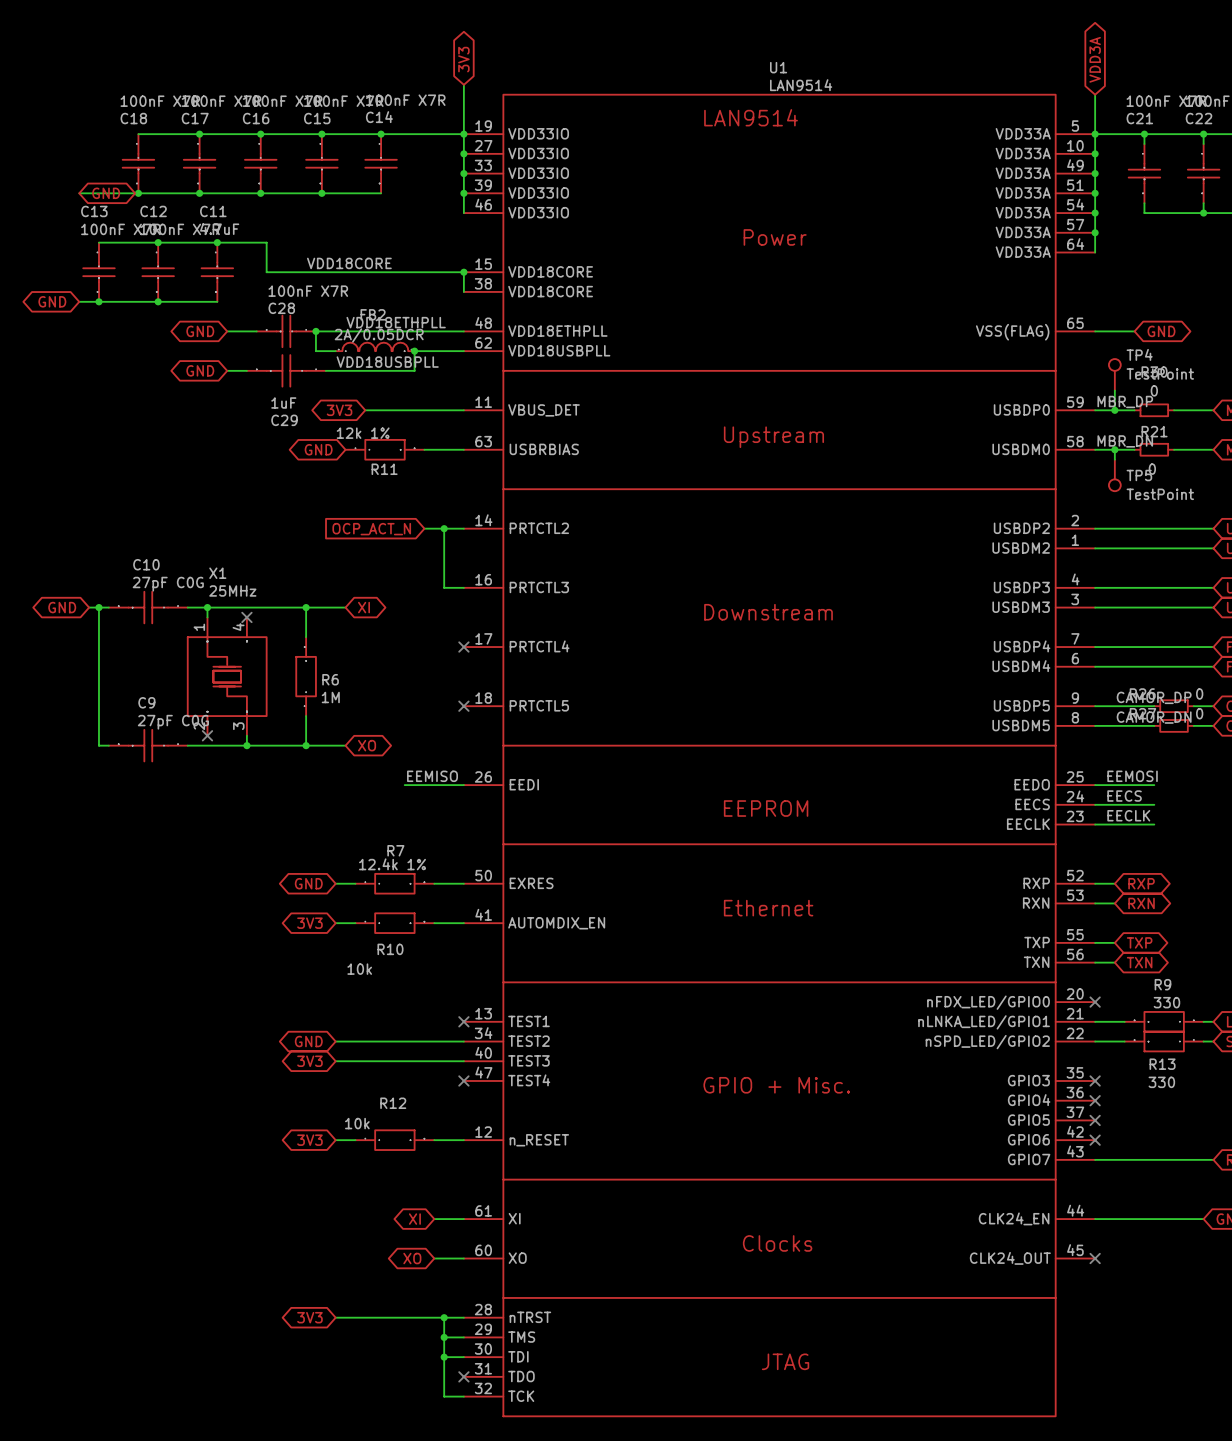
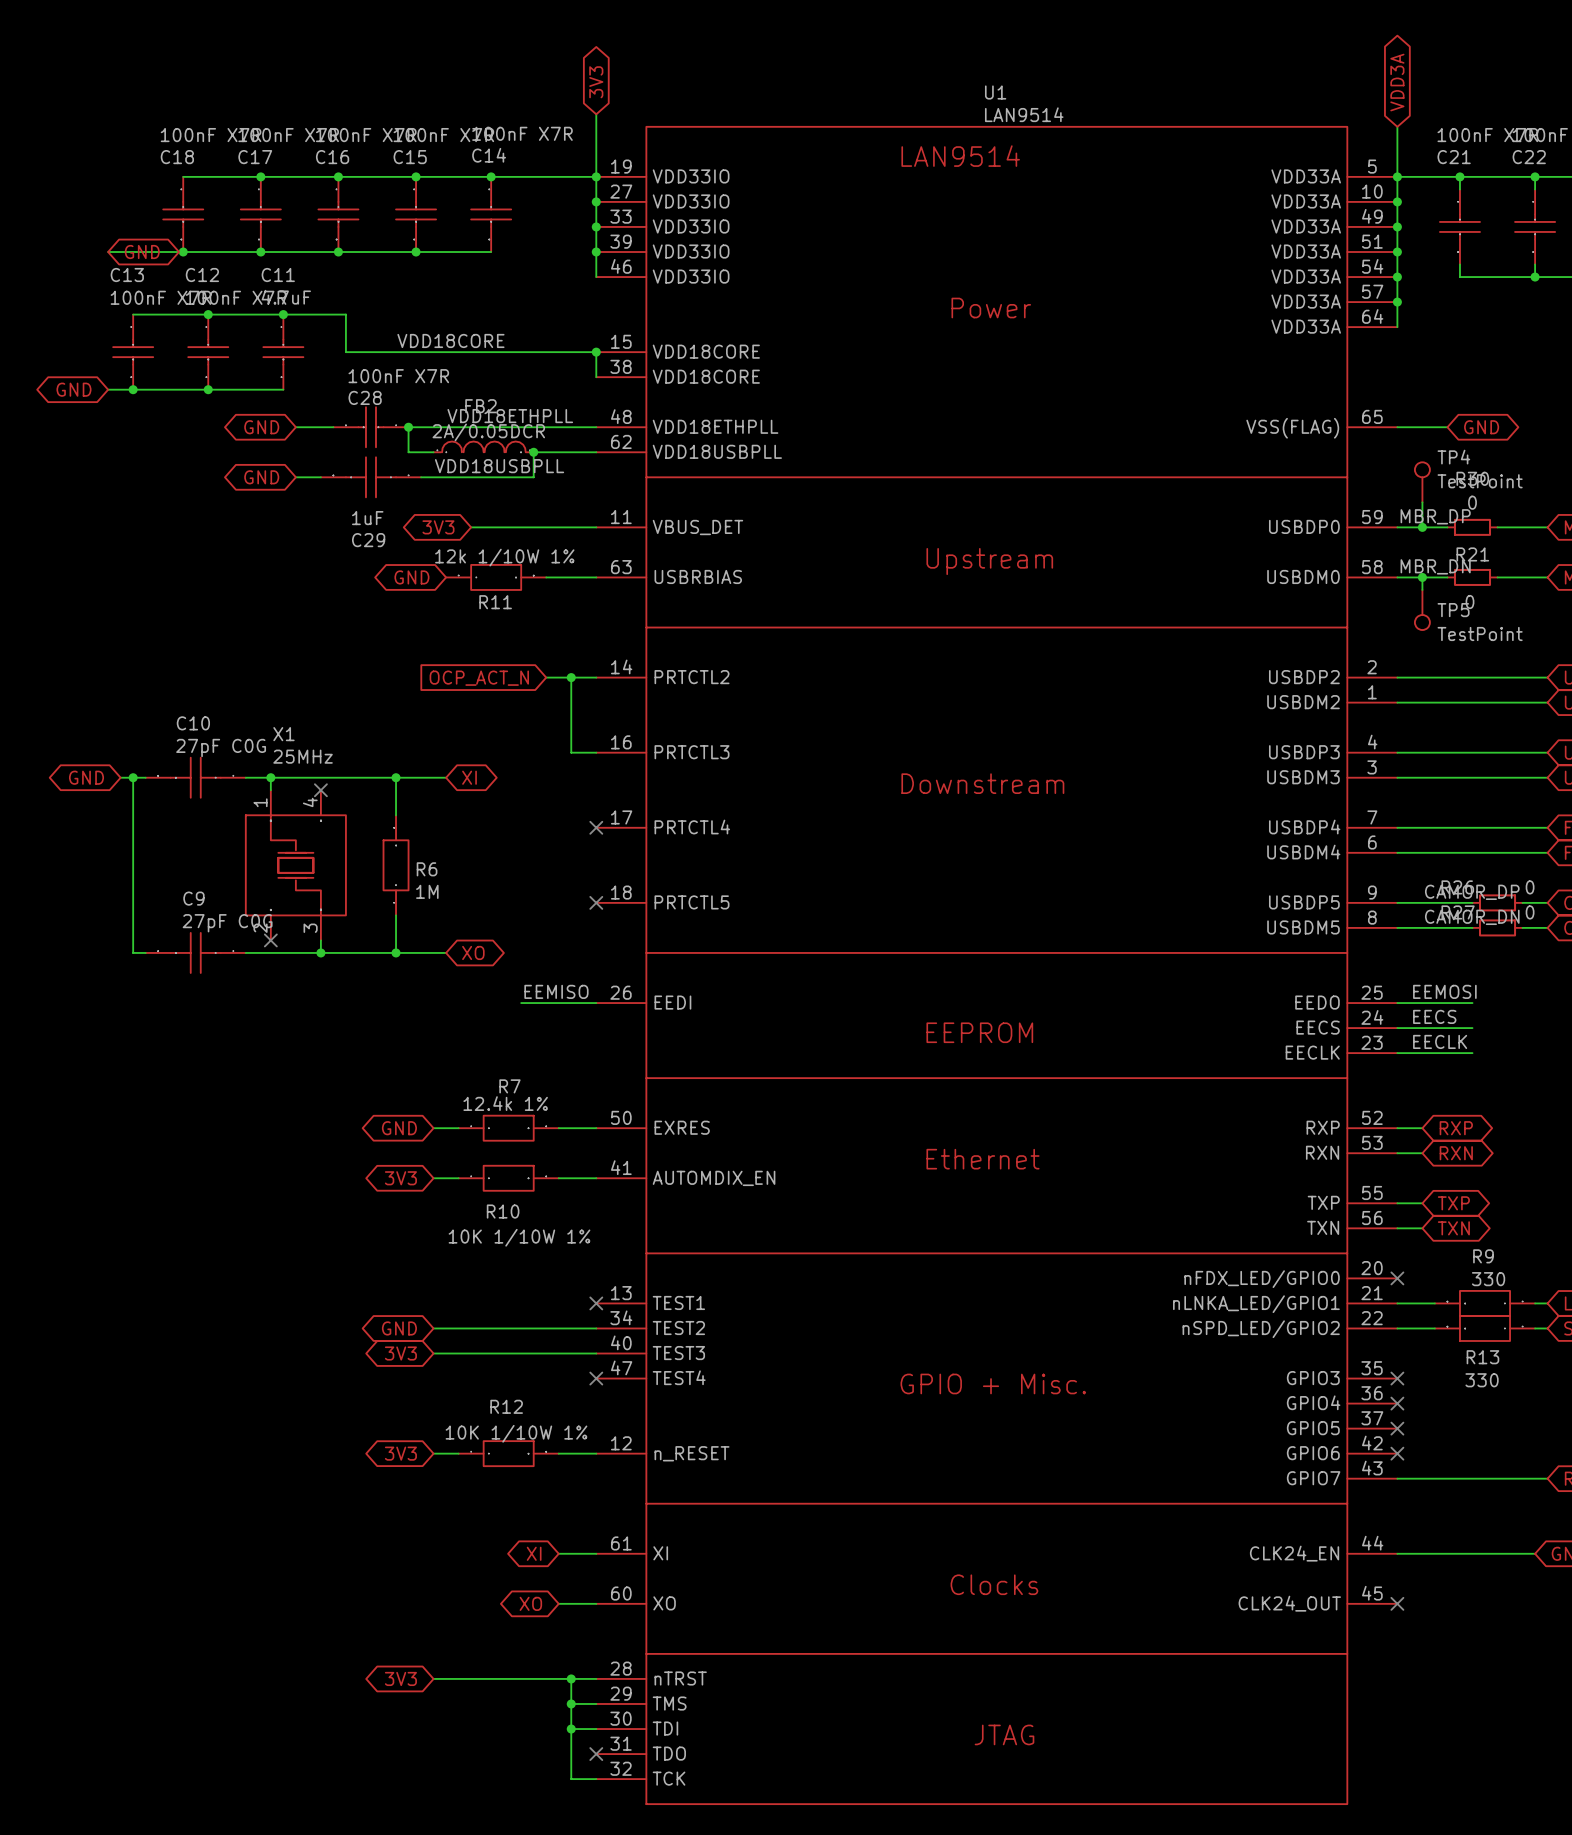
R11 value: 12k 1% (363, 433) -> 12k 1/10W 1% (504, 557)
R10 value: 10k (359, 969) -> 10K 1/10W 1% (519, 1237)
R12 value: 10k (357, 1123) -> 10K 1/10W 1% (516, 1433)

